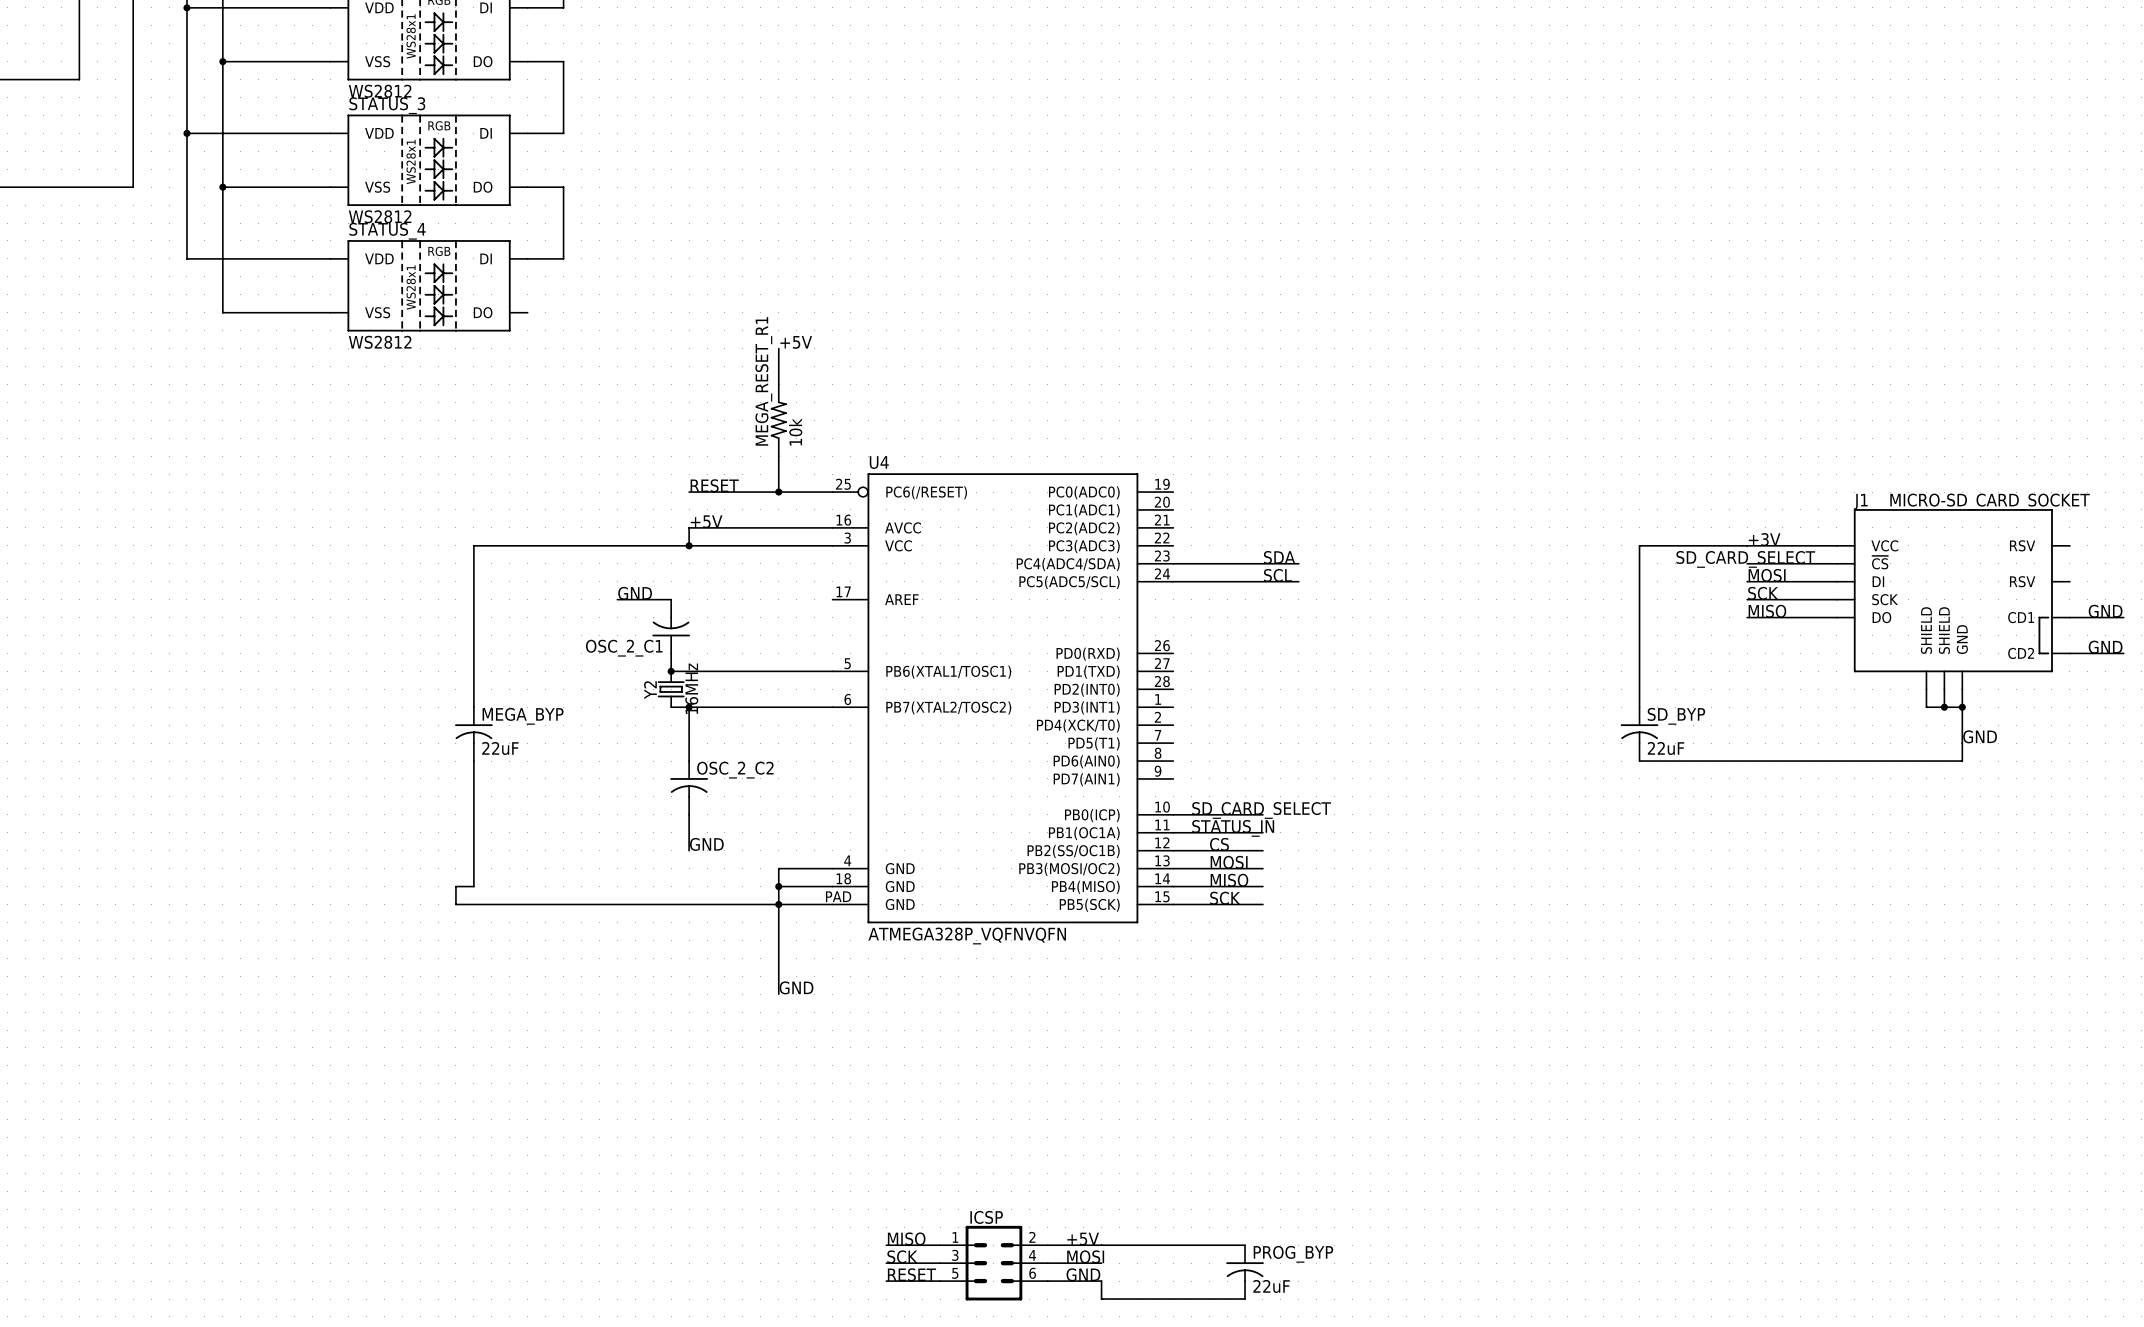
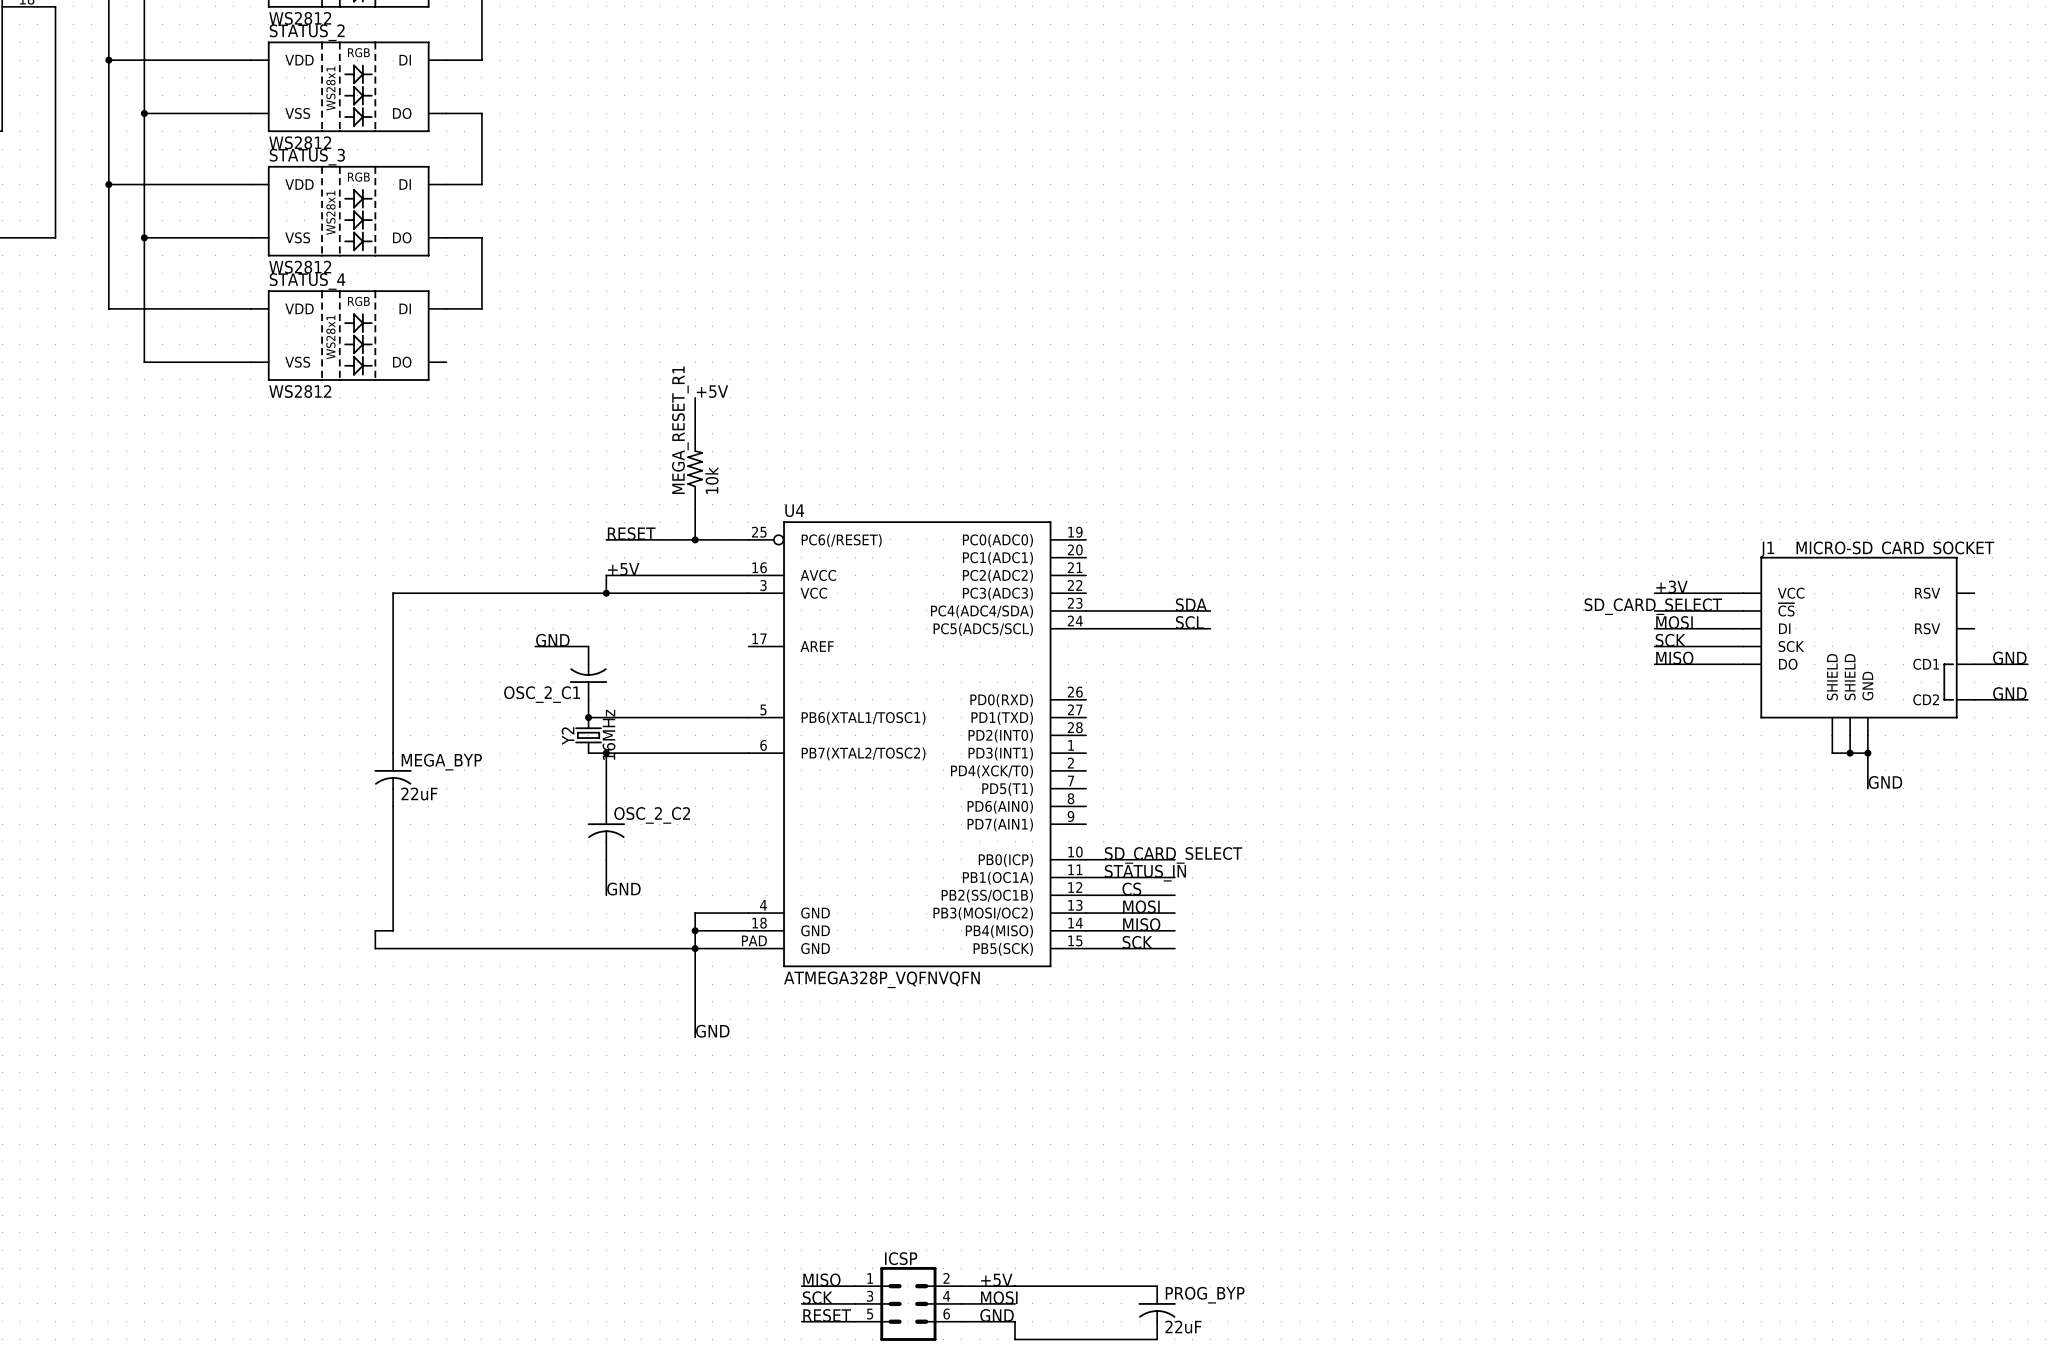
wire: (1747, 545) (1639, 545) (1639, 707) -> none
SD_BYP: 22uF (1639, 734) -> none
wire: (1962, 743) (1962, 761) (1639, 761) -> none

